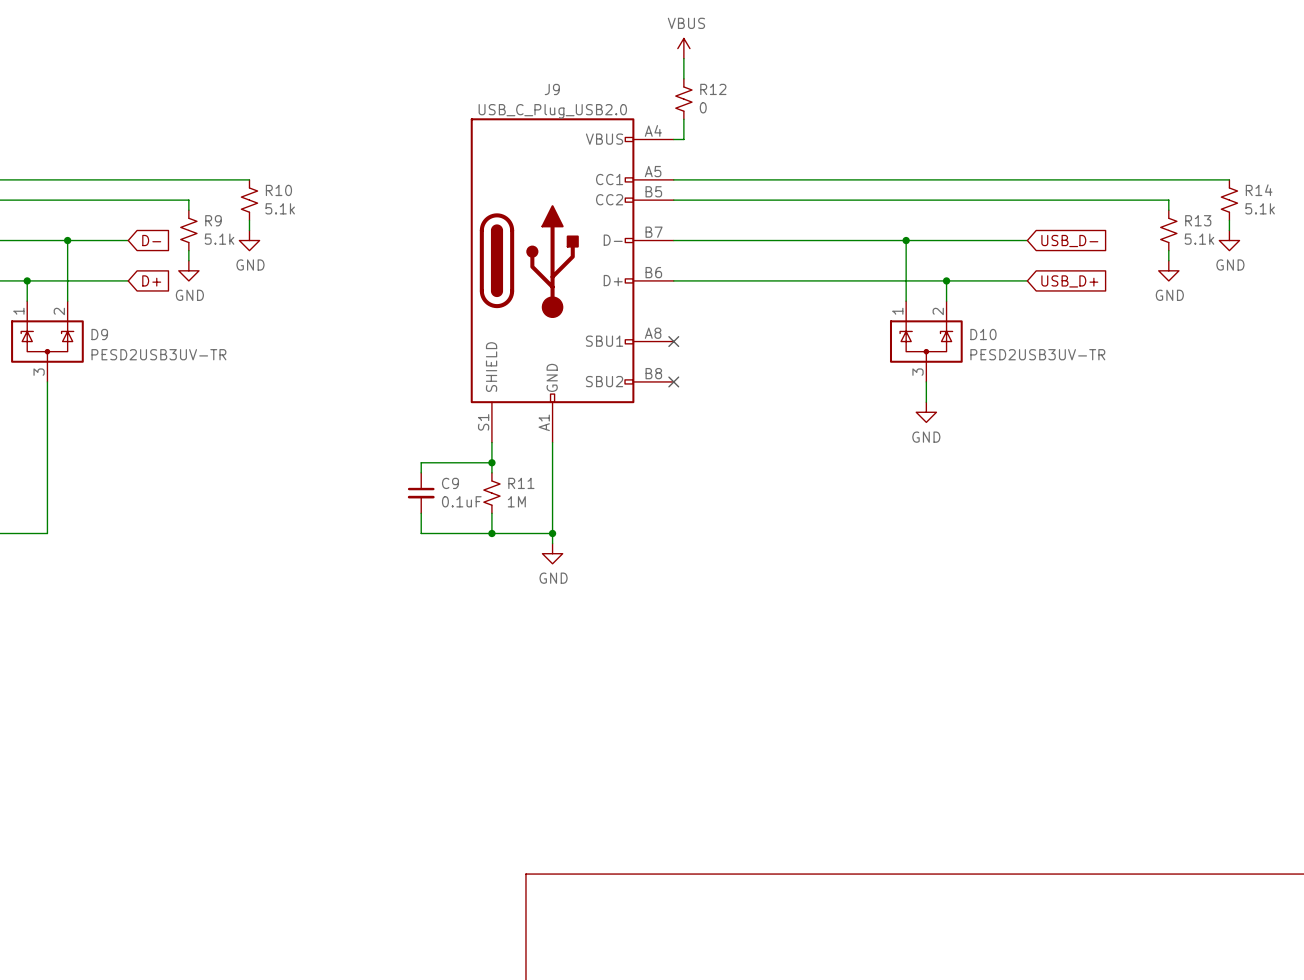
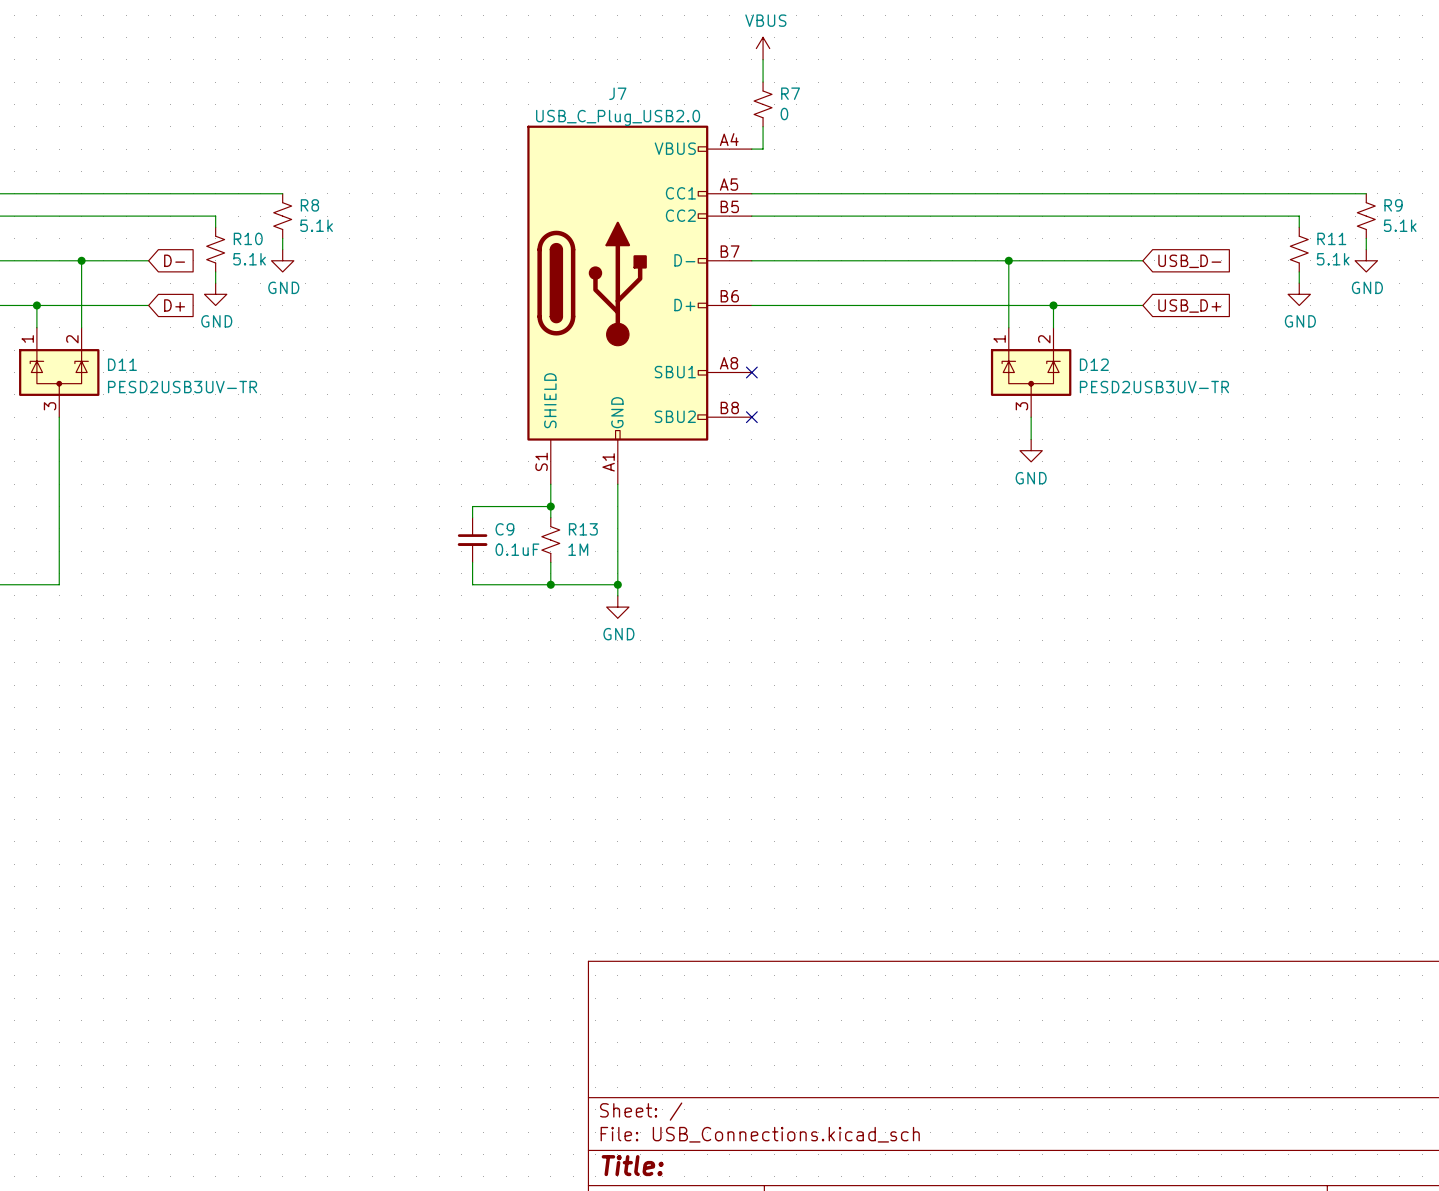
J9 name: J9 (552, 89) -> J7 (617, 93)
R12 name: R12 (713, 89) -> R7 (790, 93)
R10 name: R10 (278, 190) -> R8 (309, 205)
R14 name: R14 (1259, 190) -> R9 (1393, 205)
R9 name: R9 (213, 220) -> R10 (248, 238)
R13 name: R13 (1198, 220) -> R11 (1331, 238)
D9 name: D9 (99, 334) -> D11 (122, 364)
D10 name: D10 (983, 334) -> D12 (1094, 364)
R11 name: R11 (521, 483) -> R13 (583, 529)

